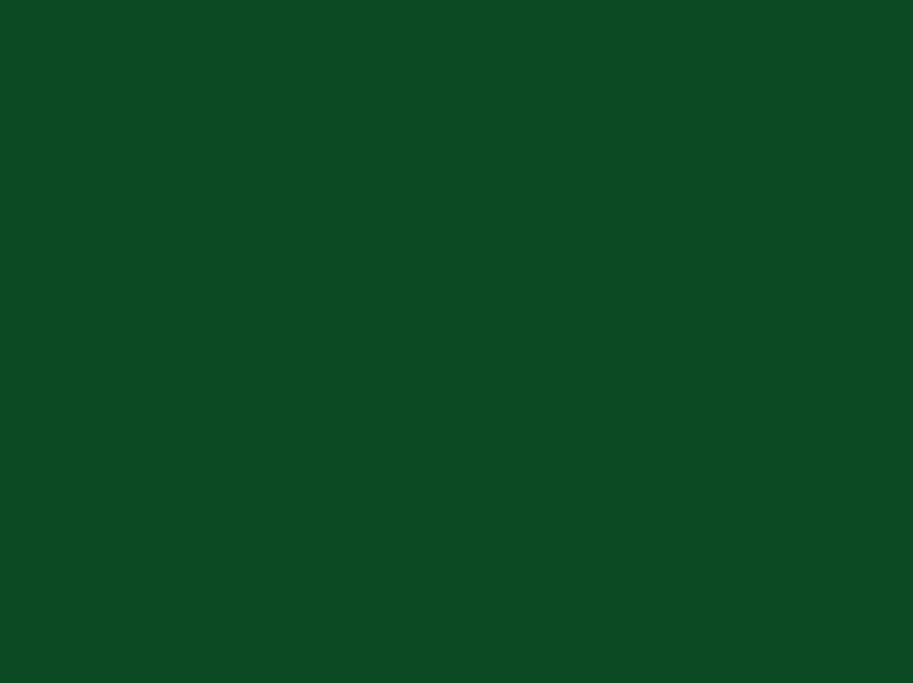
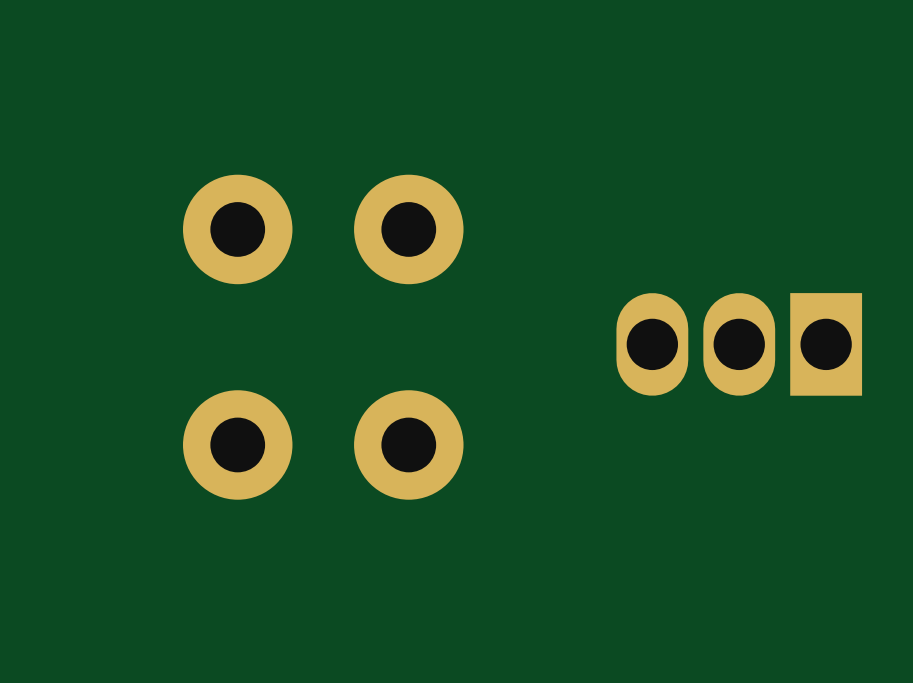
part: none -> (323, 229)
part: none -> (739, 344)
part: none -> (323, 444)

